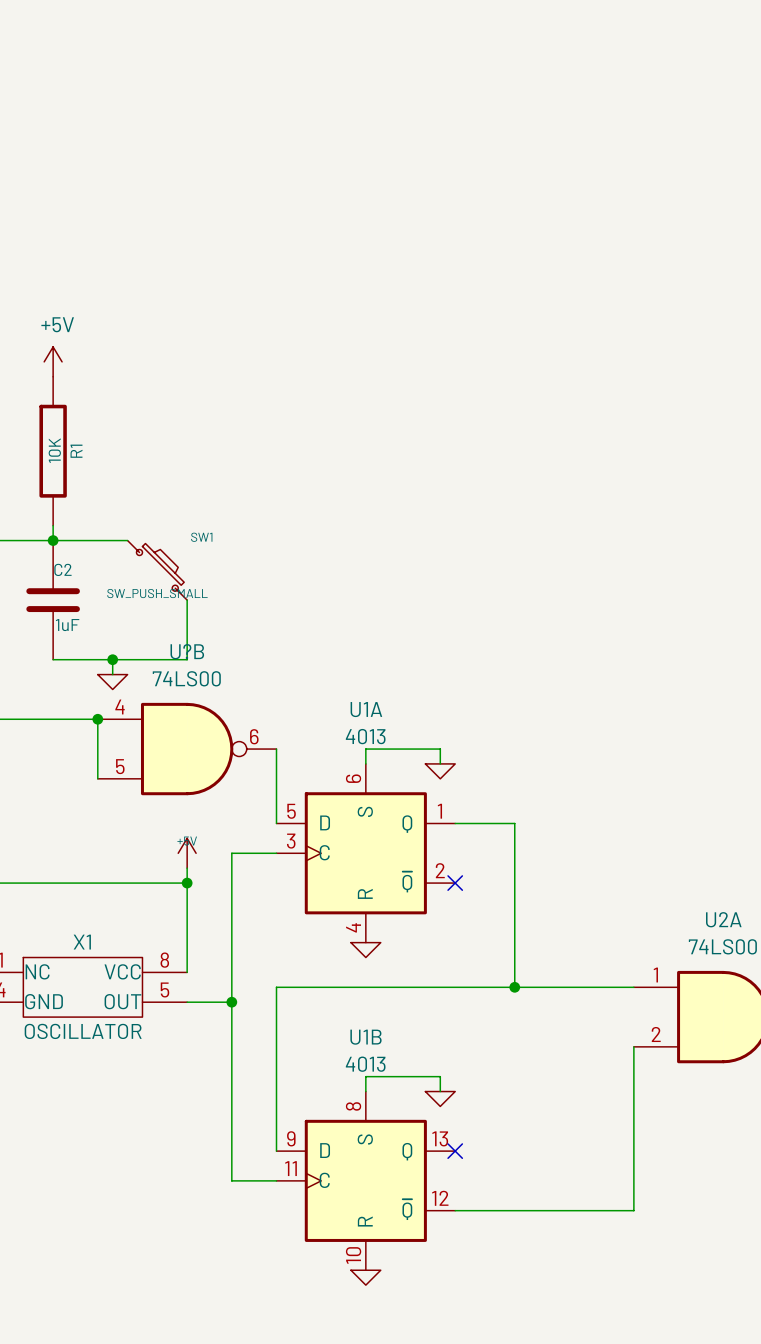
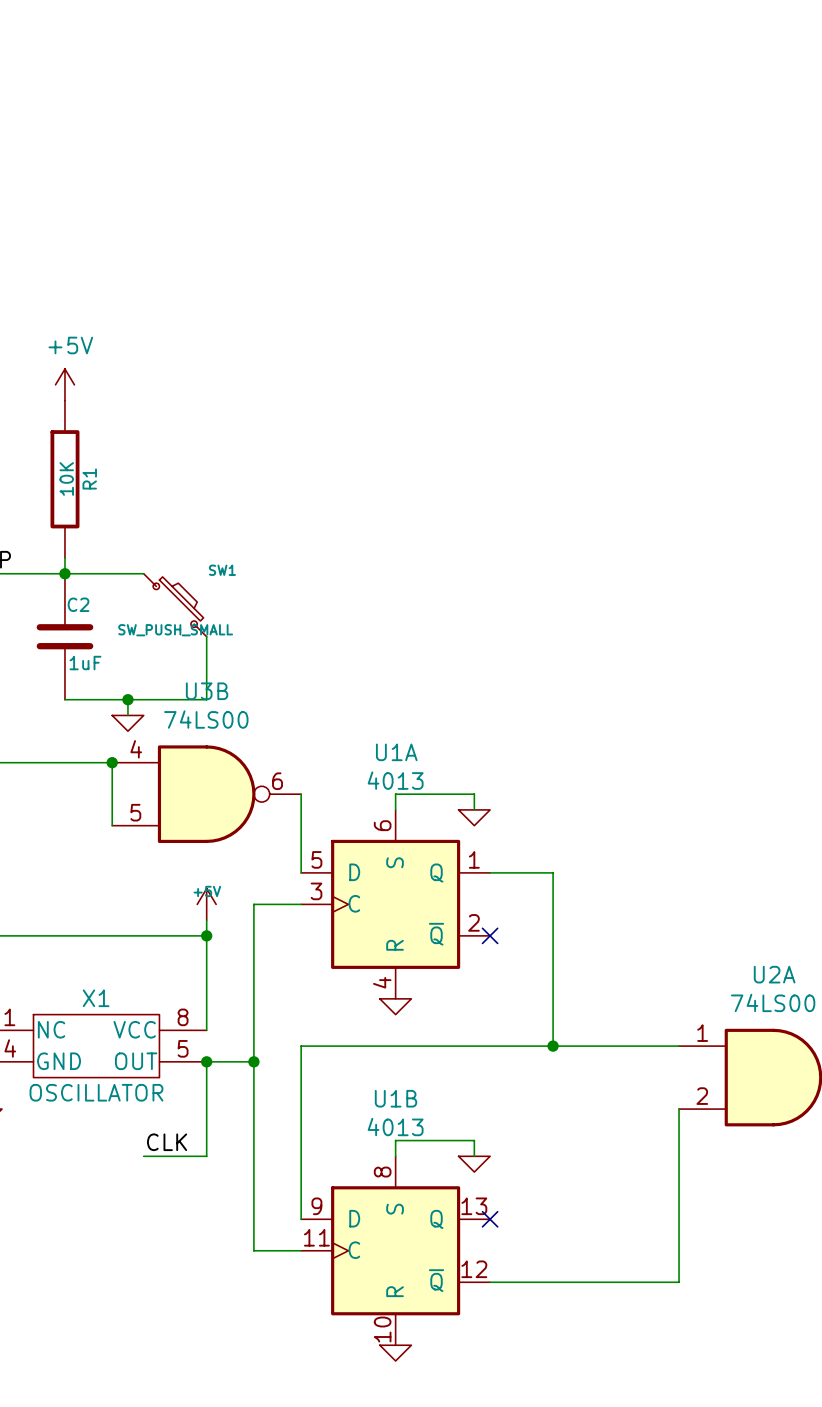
U?B name: U?B (187, 651) -> U3B (207, 691)
wire: none -> (206, 1061) (206, 1156) (143, 1156)
junction: none -> (206, 1061)
label: none -> CLK (167, 1142)

